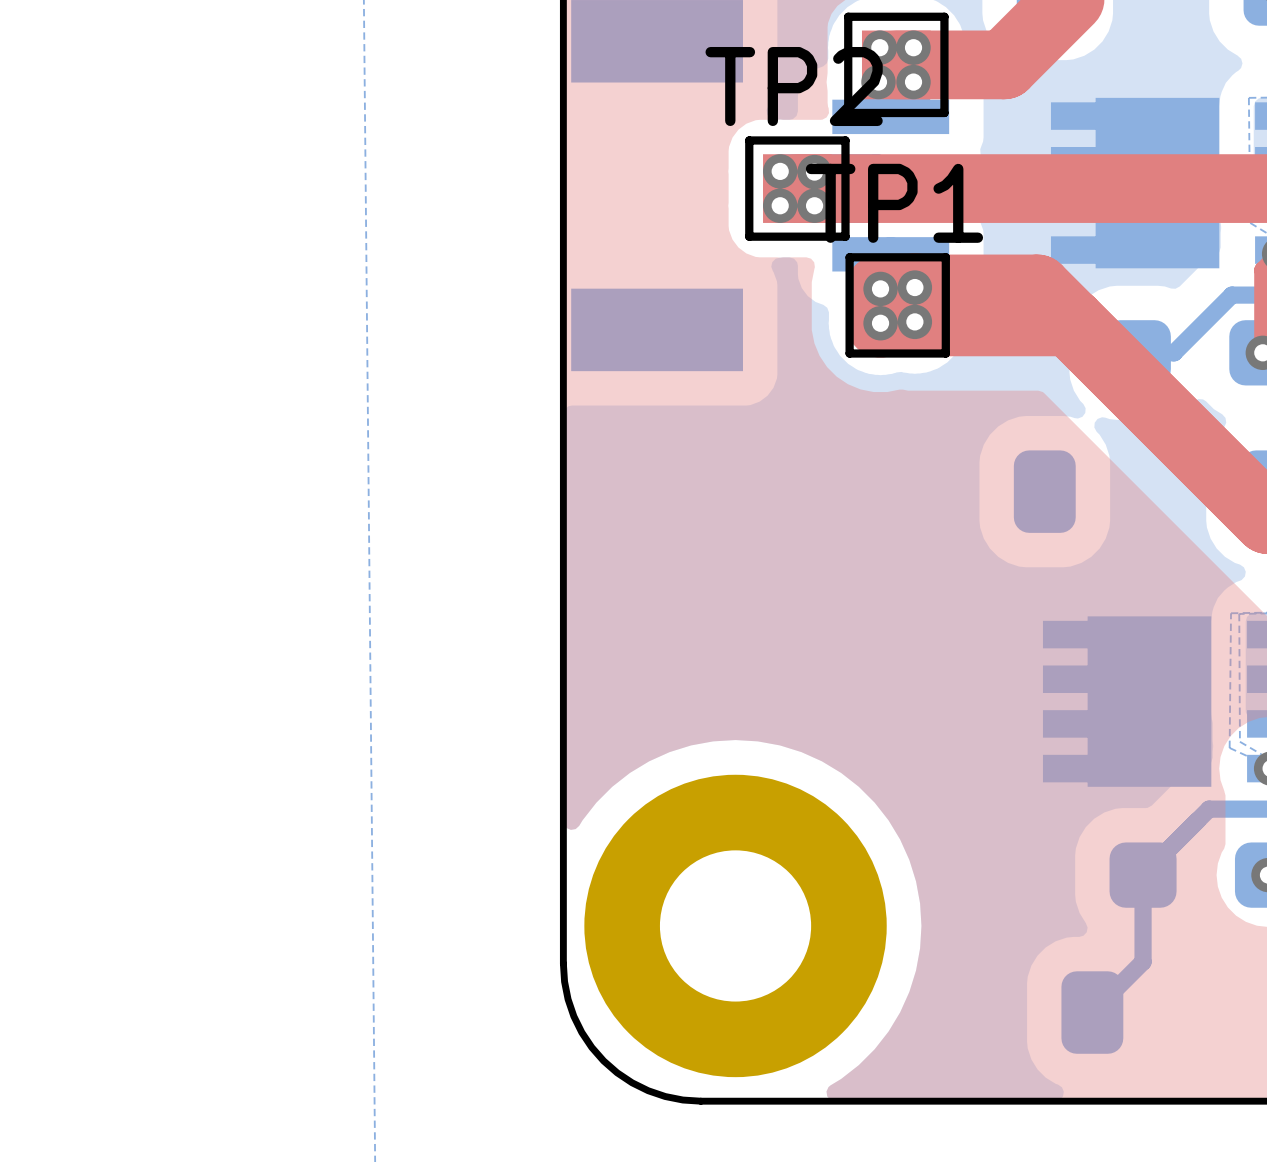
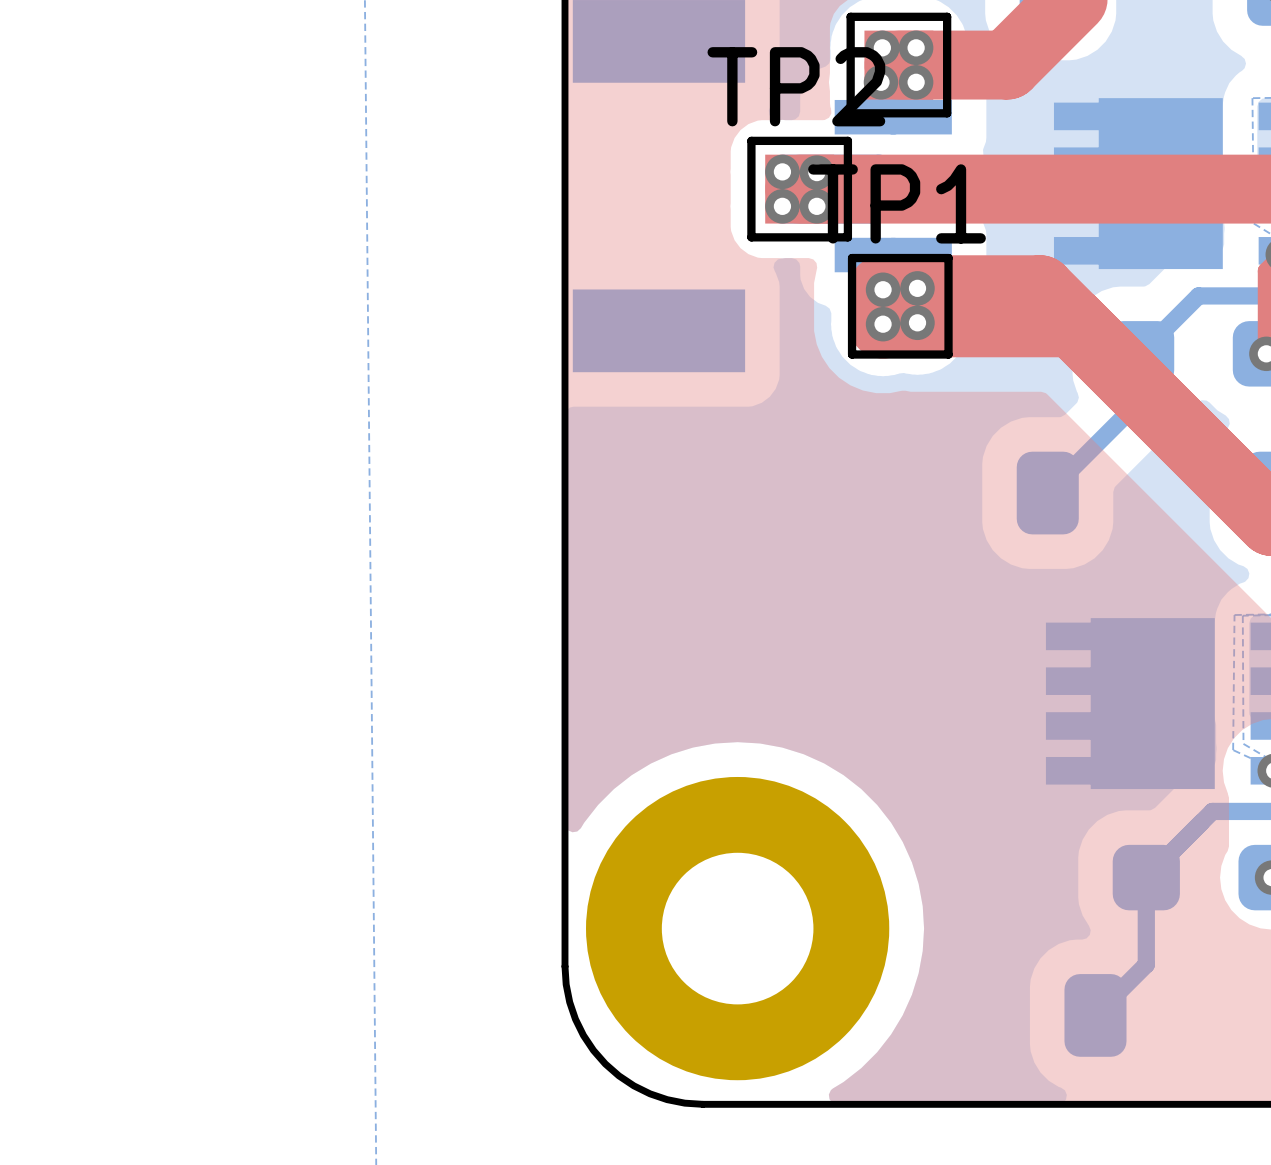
bottom track: (1231, 295) (1174, 352) (1137, 352) -> (1235, 295) (1198, 295) (1140, 353) (1140, 400) (1047, 493)

